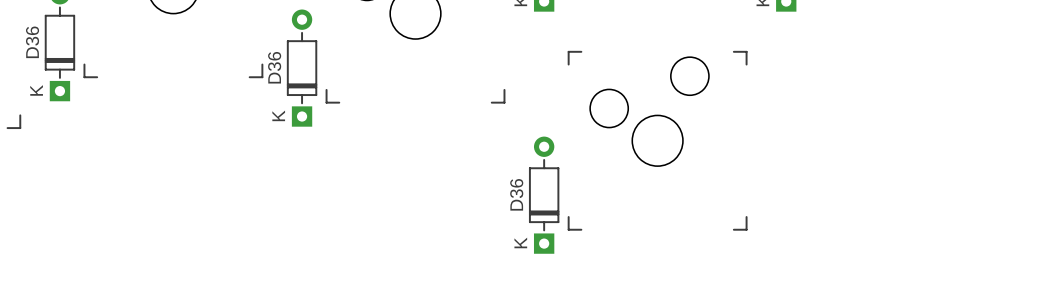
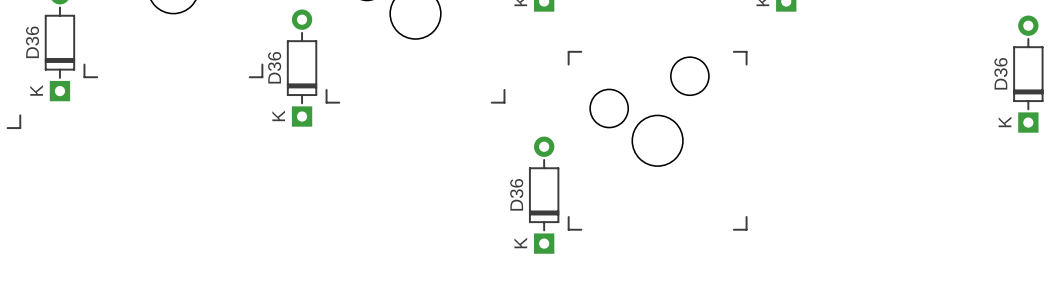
D36: none -> (1028, 74)

